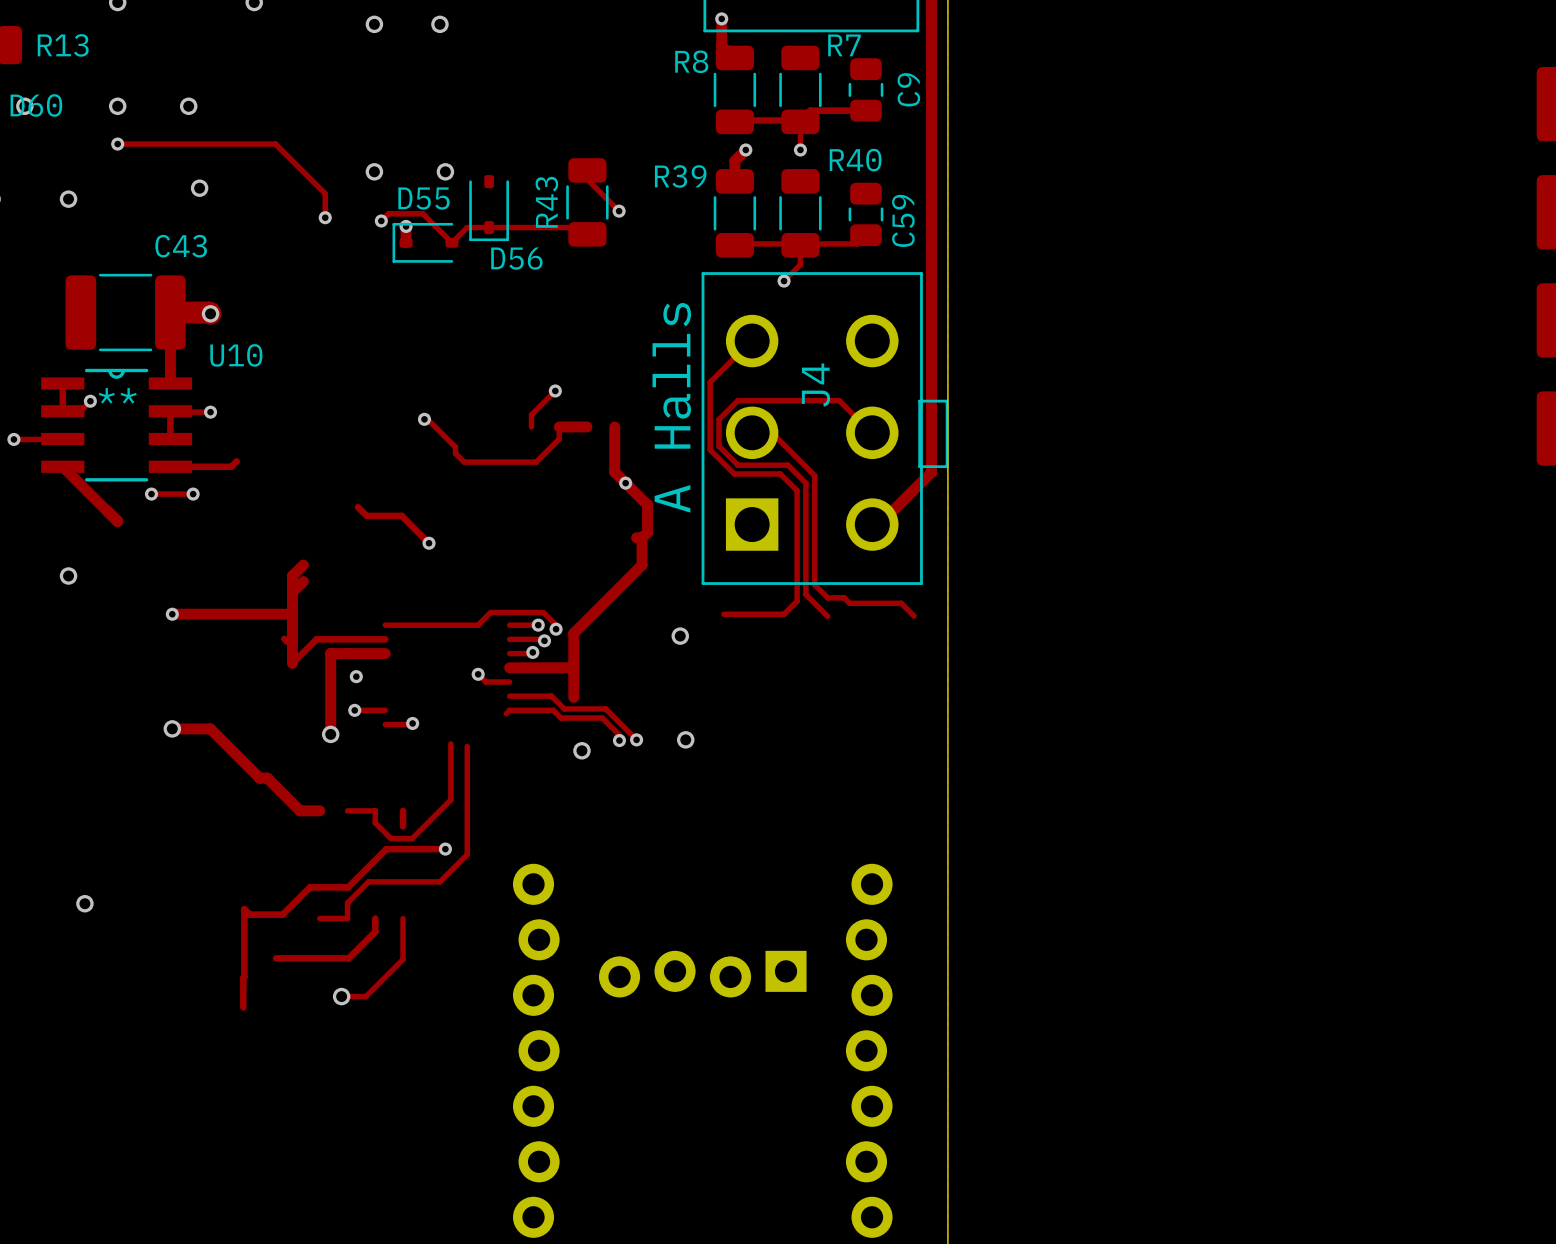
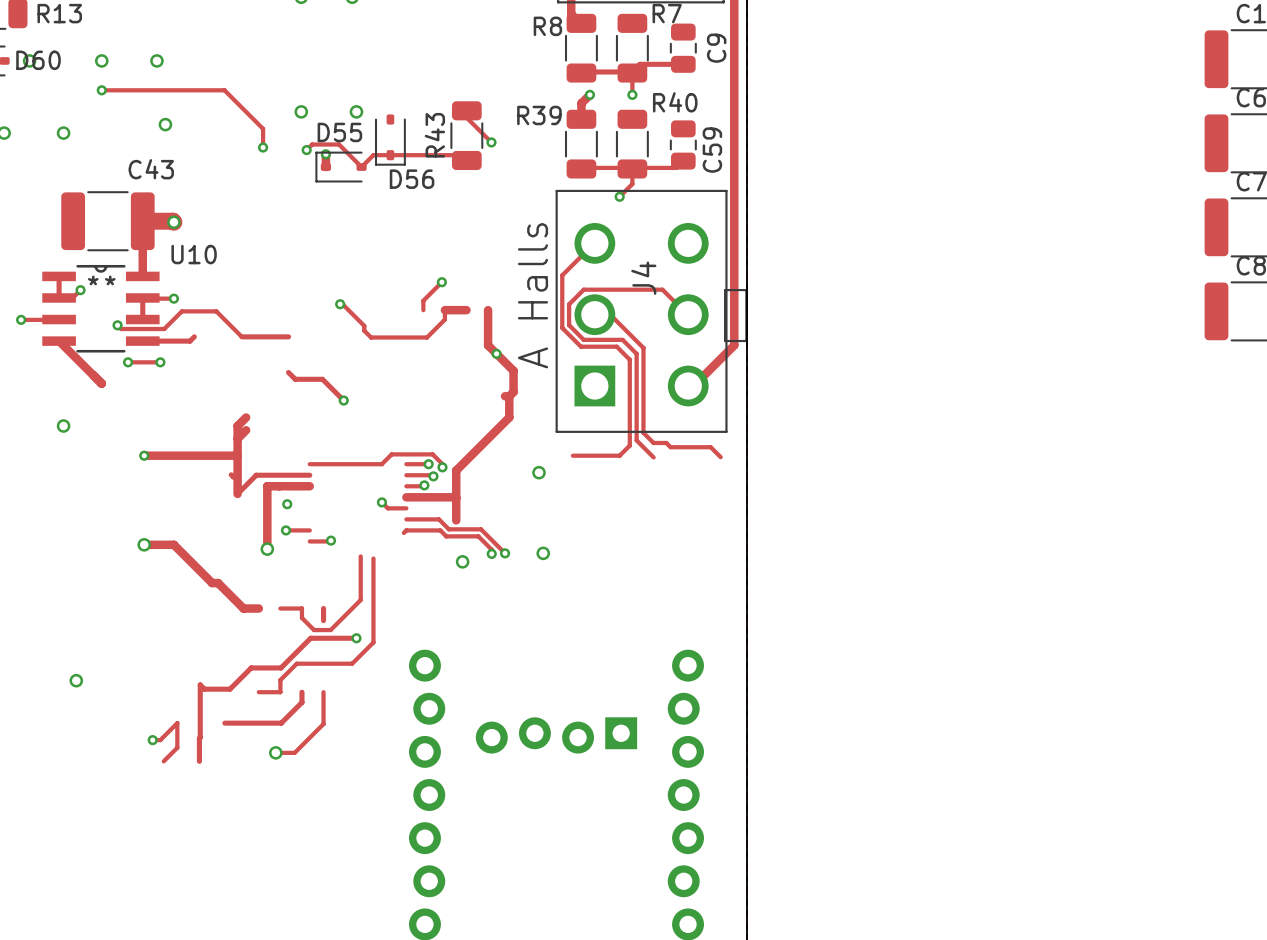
track: none -> (117, 325) (121, 328) (164, 328) (181, 311) (216, 311) (241, 336) (288, 336)
via: none -> (117, 325)
track: none -> (152, 740) (160, 740) (177, 723) (177, 747) (163, 761)
via: none -> (152, 740)

